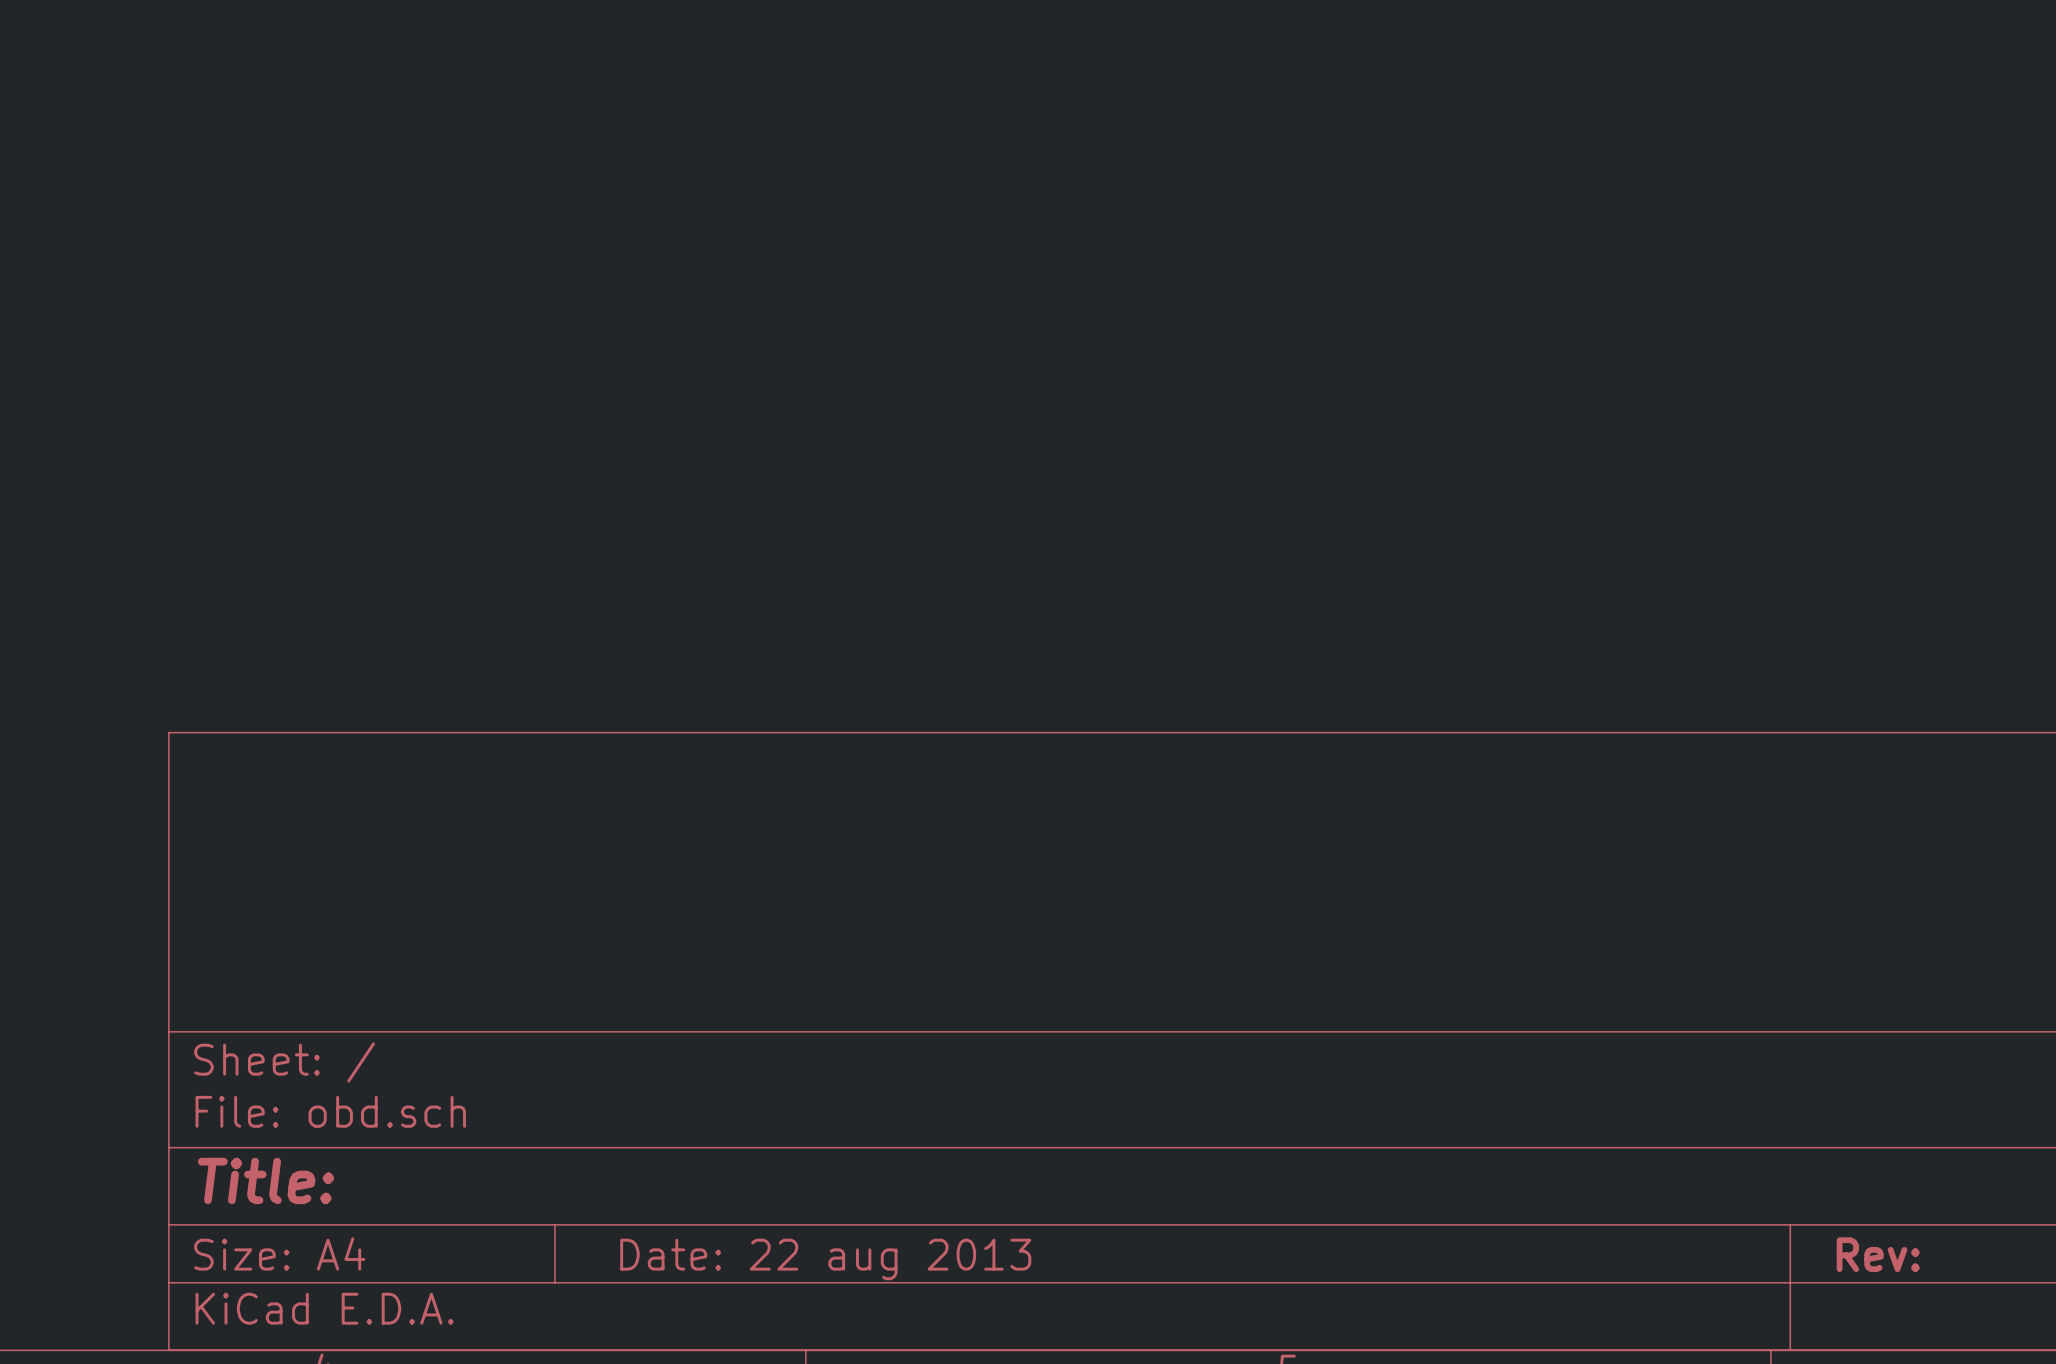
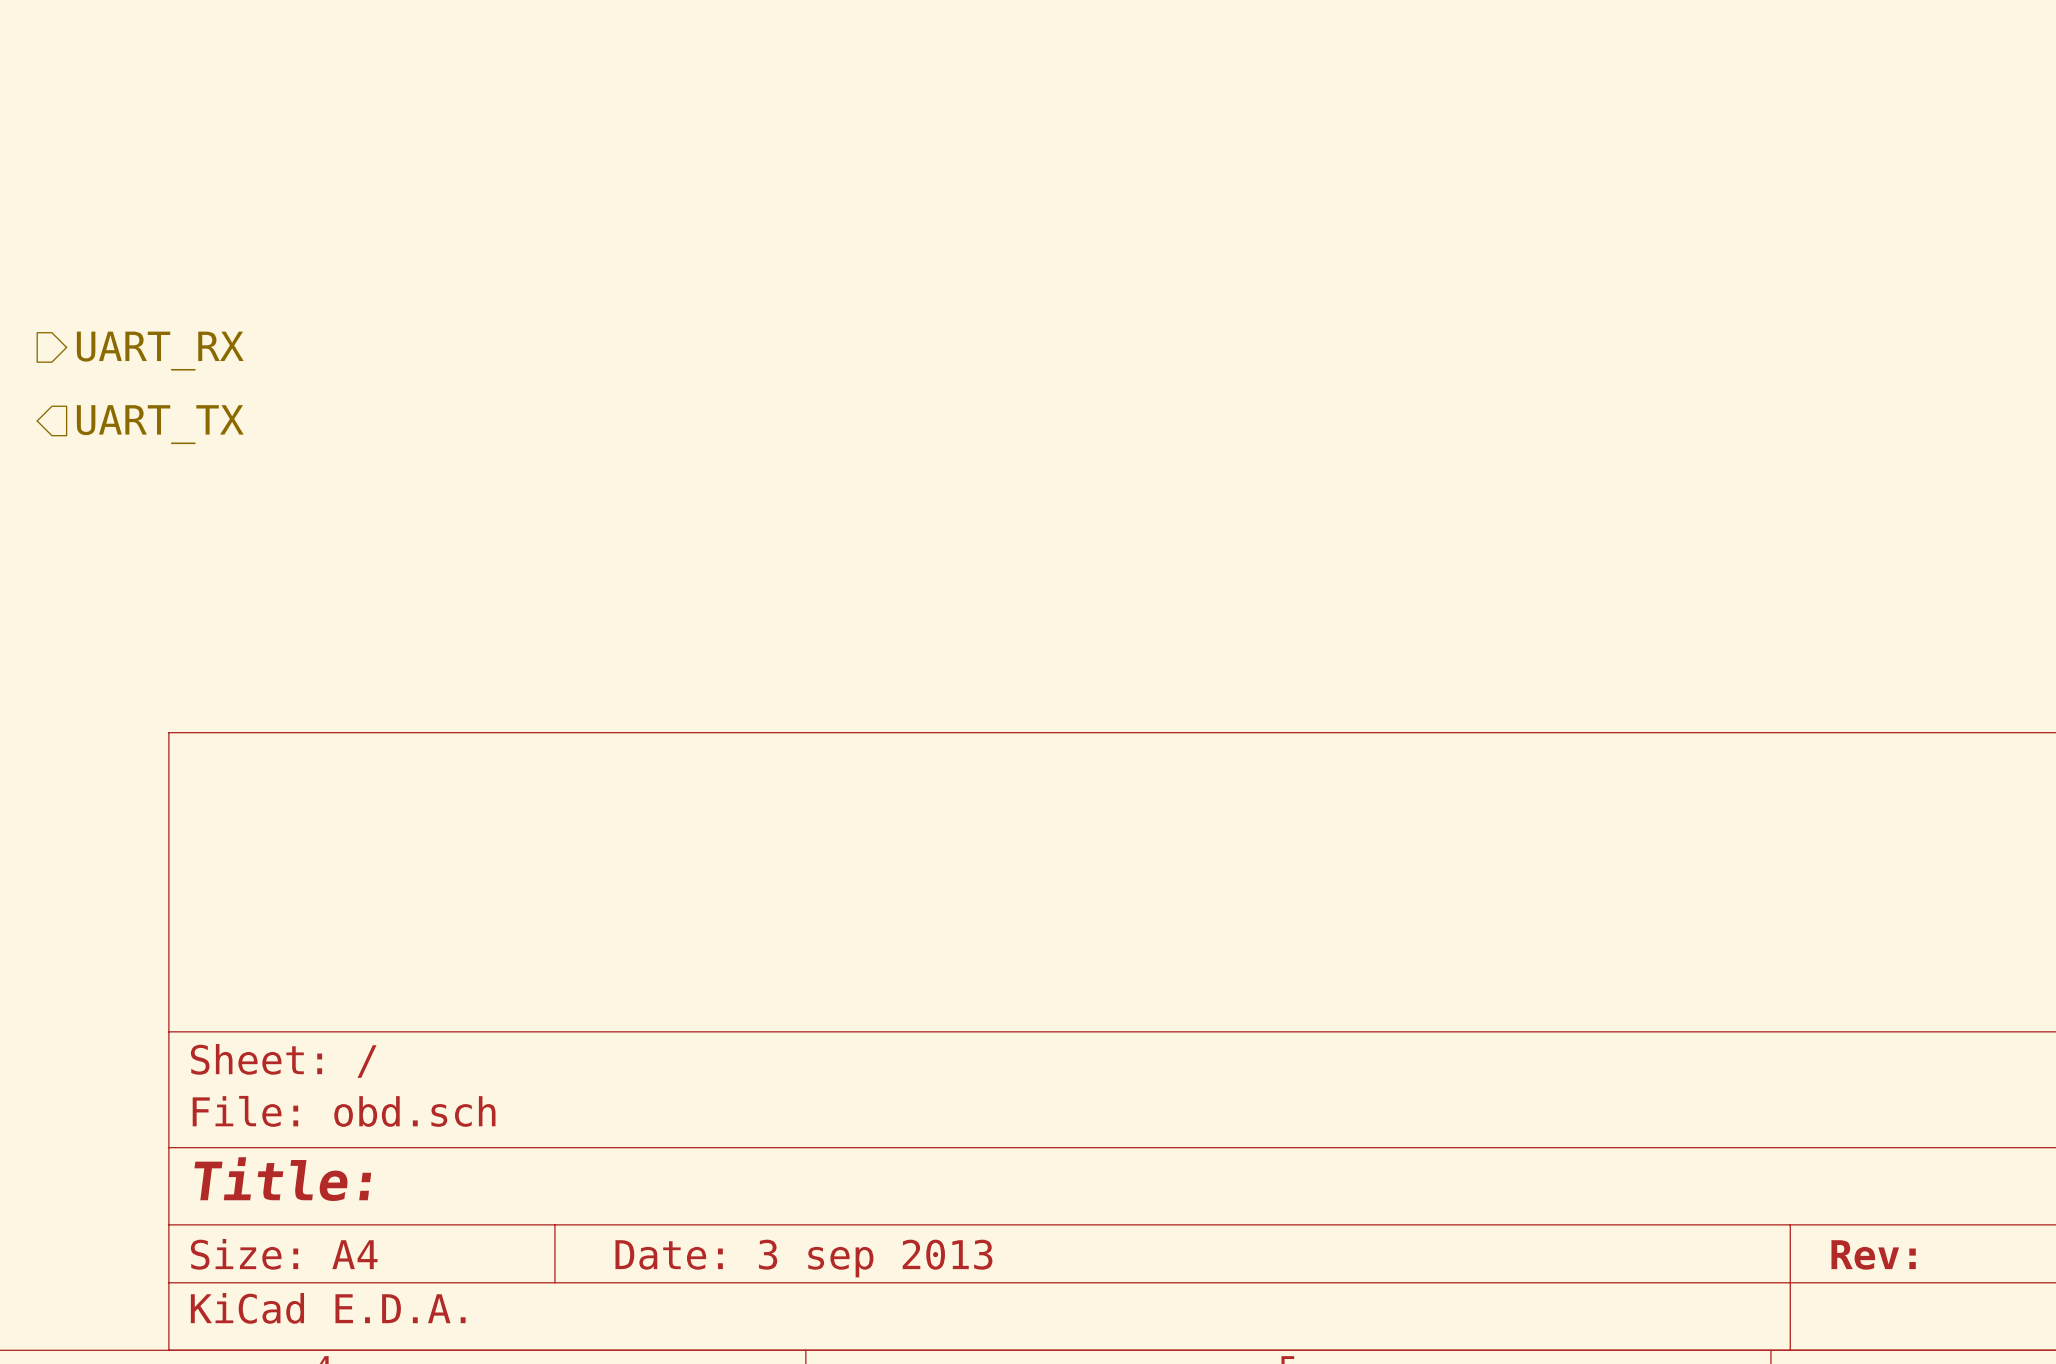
hierarchical label: none -> UART_RX (160, 351)
hierarchical label: none -> UART_TX (160, 424)
title block: Date: 22 aug 2013 (825, 1259) -> Date: 3 sep 2013 (803, 1258)

